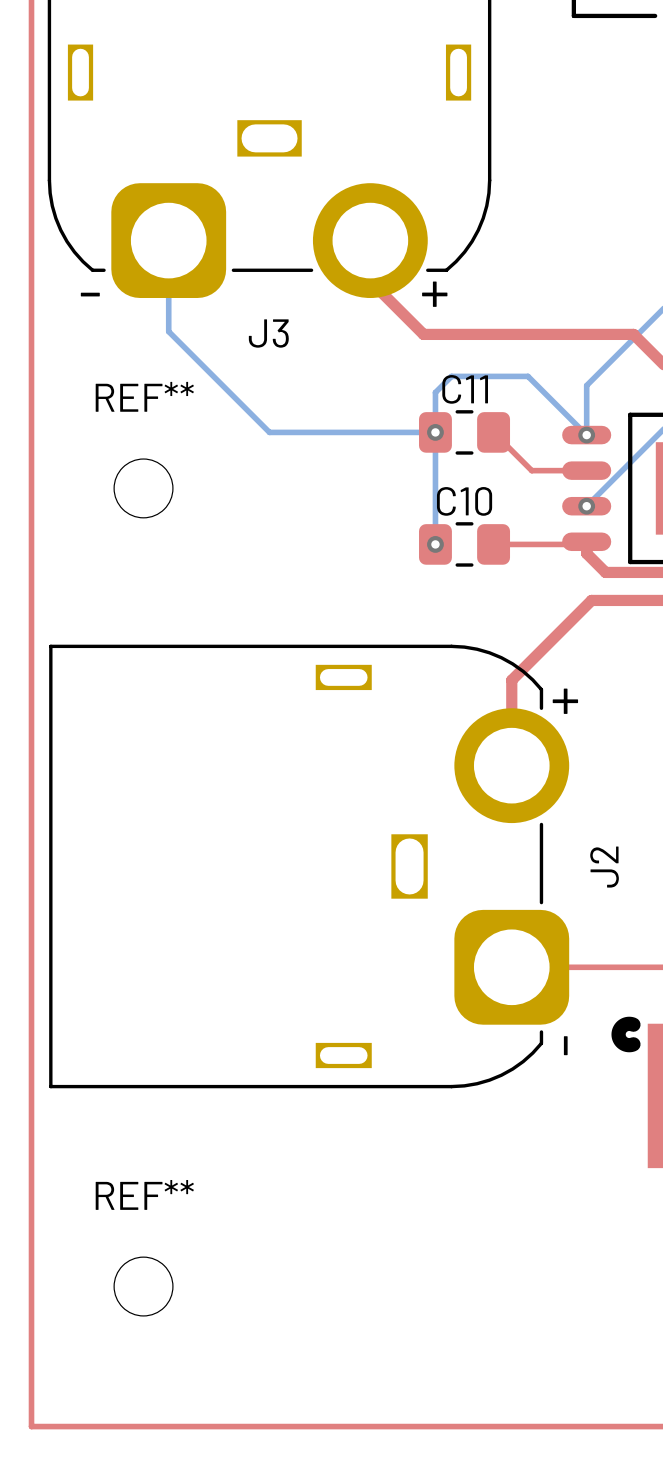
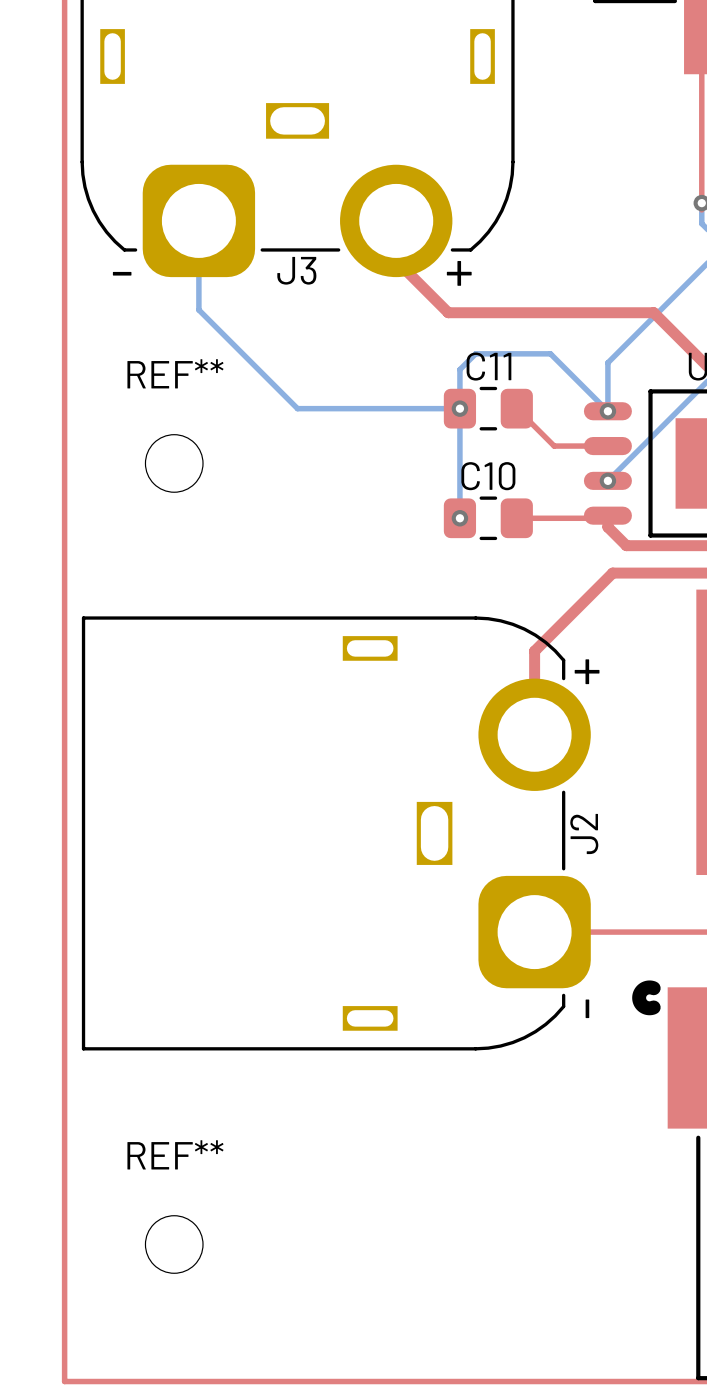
J3 name position: J3 (268, 333) -> J3 (296, 270)
J2 name position: J2 (604, 867) -> J2 (584, 833)

